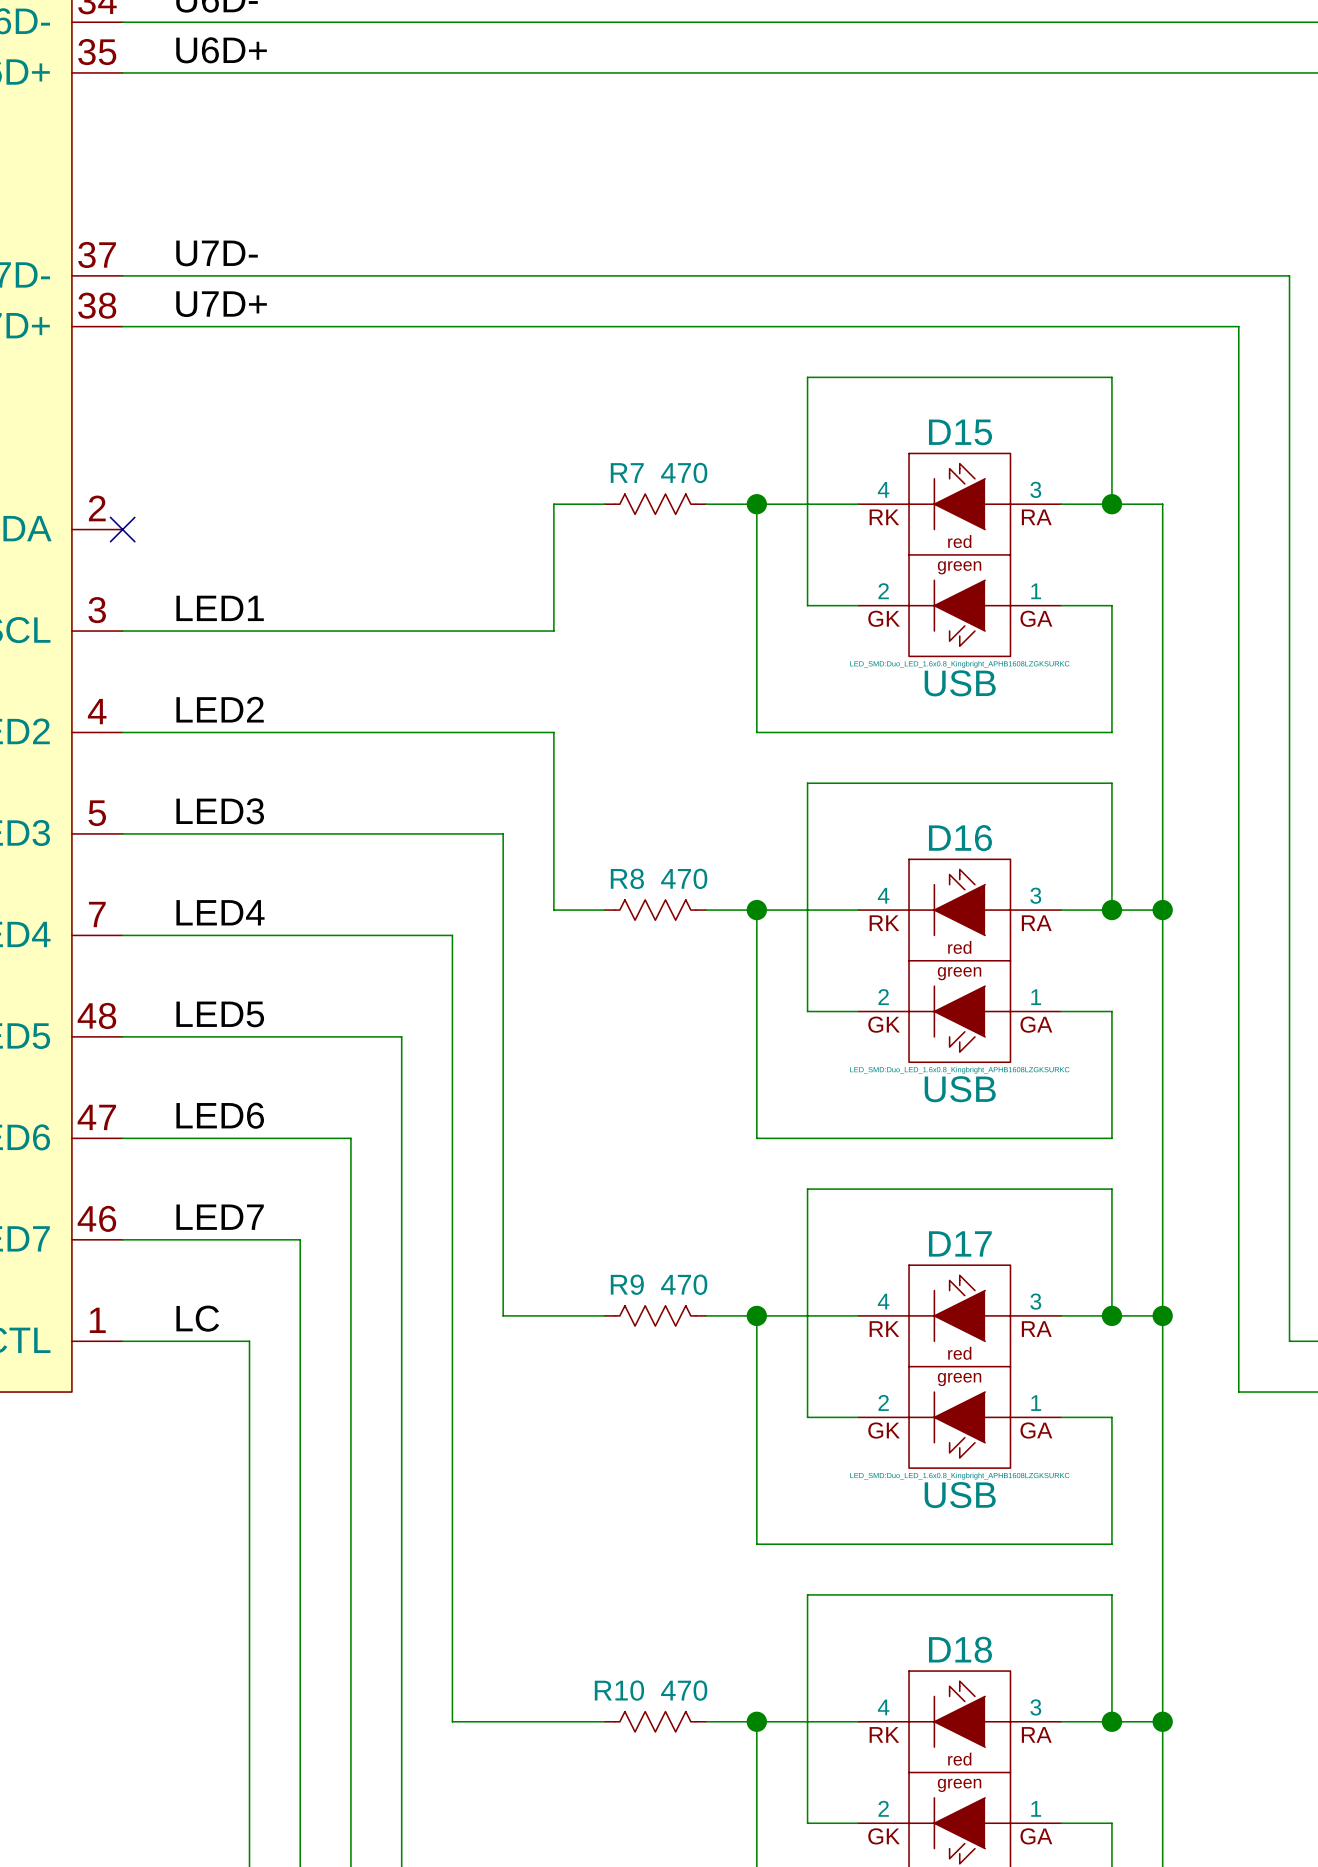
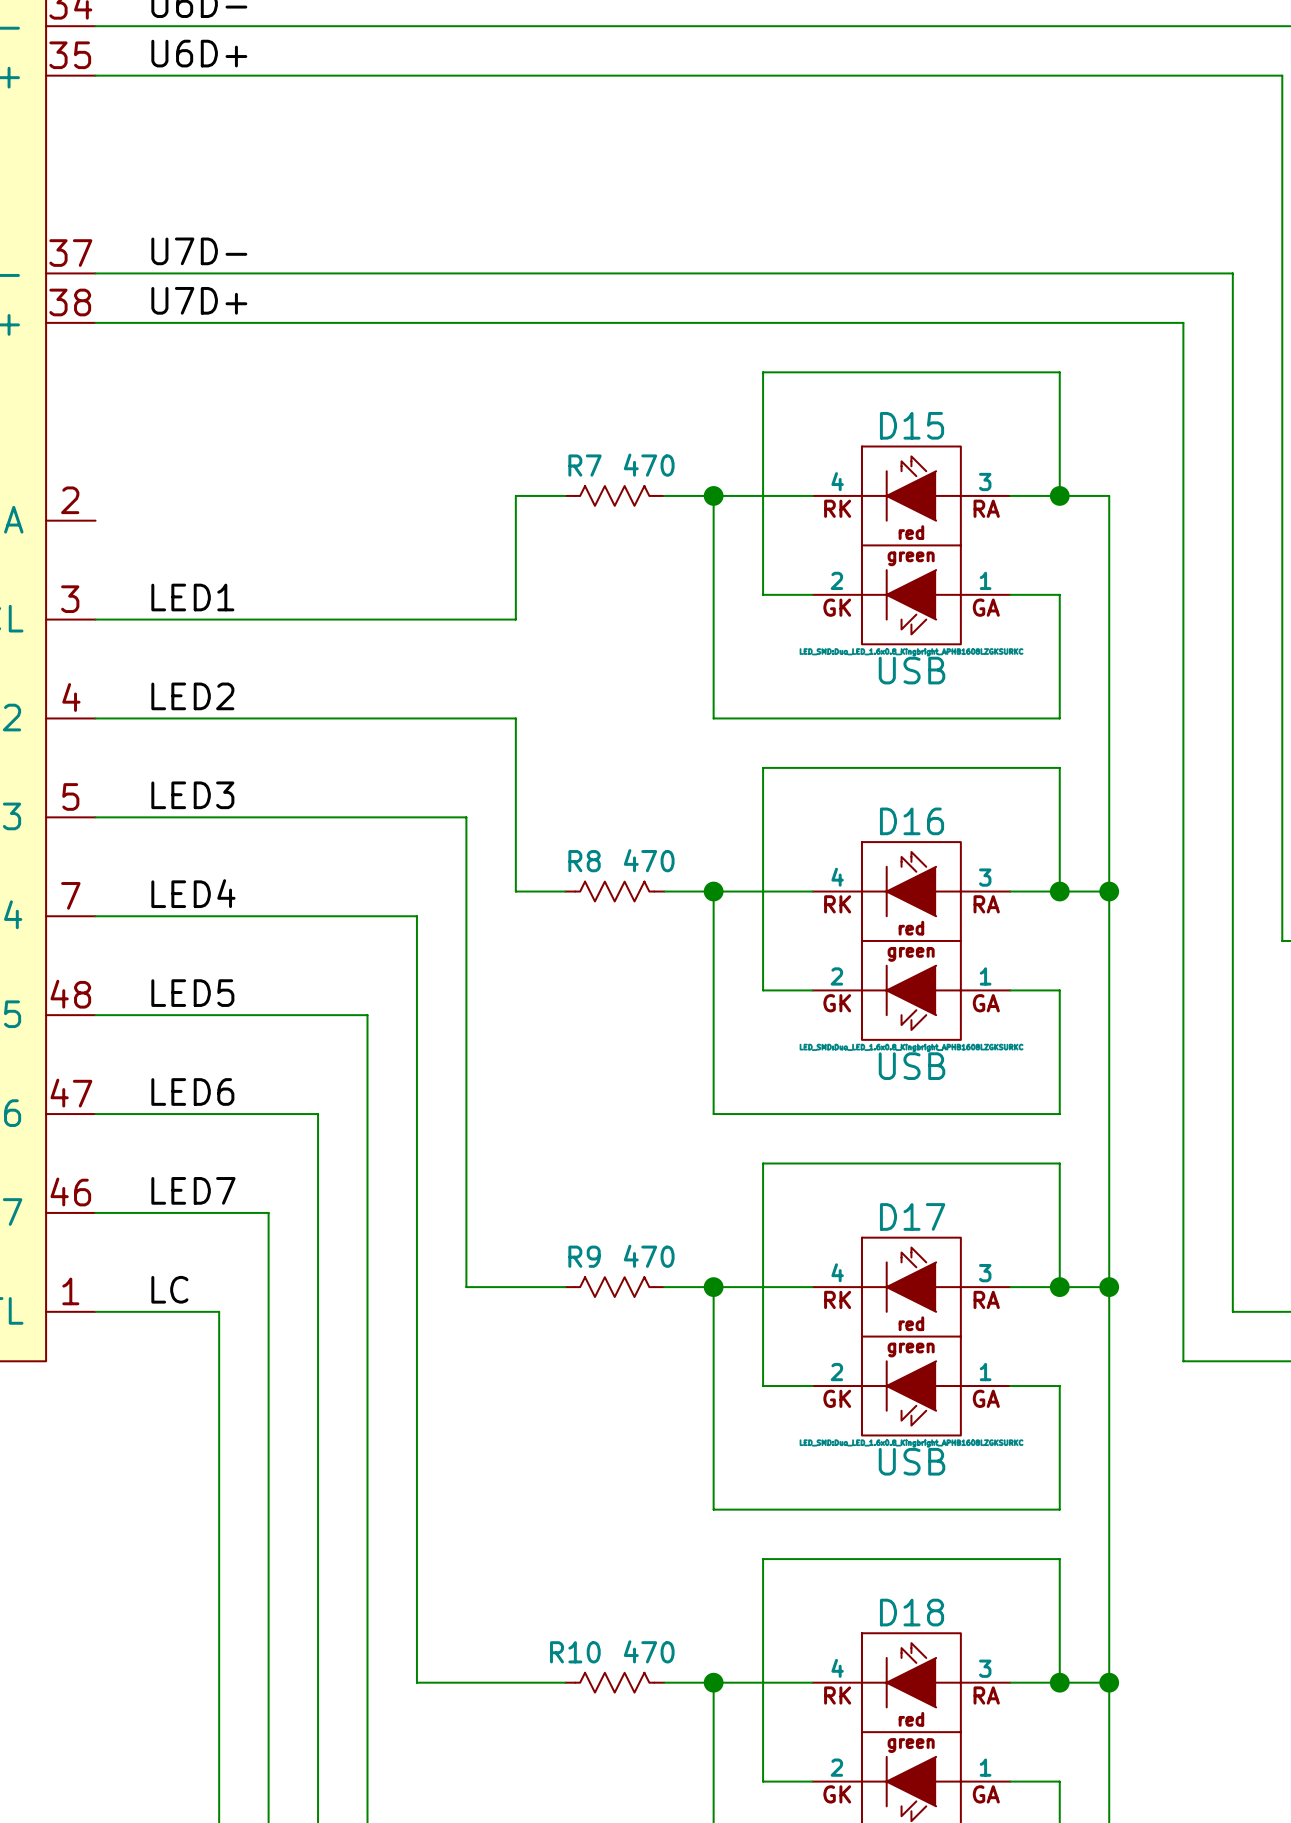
no-connect mark: (122, 529) -> none

